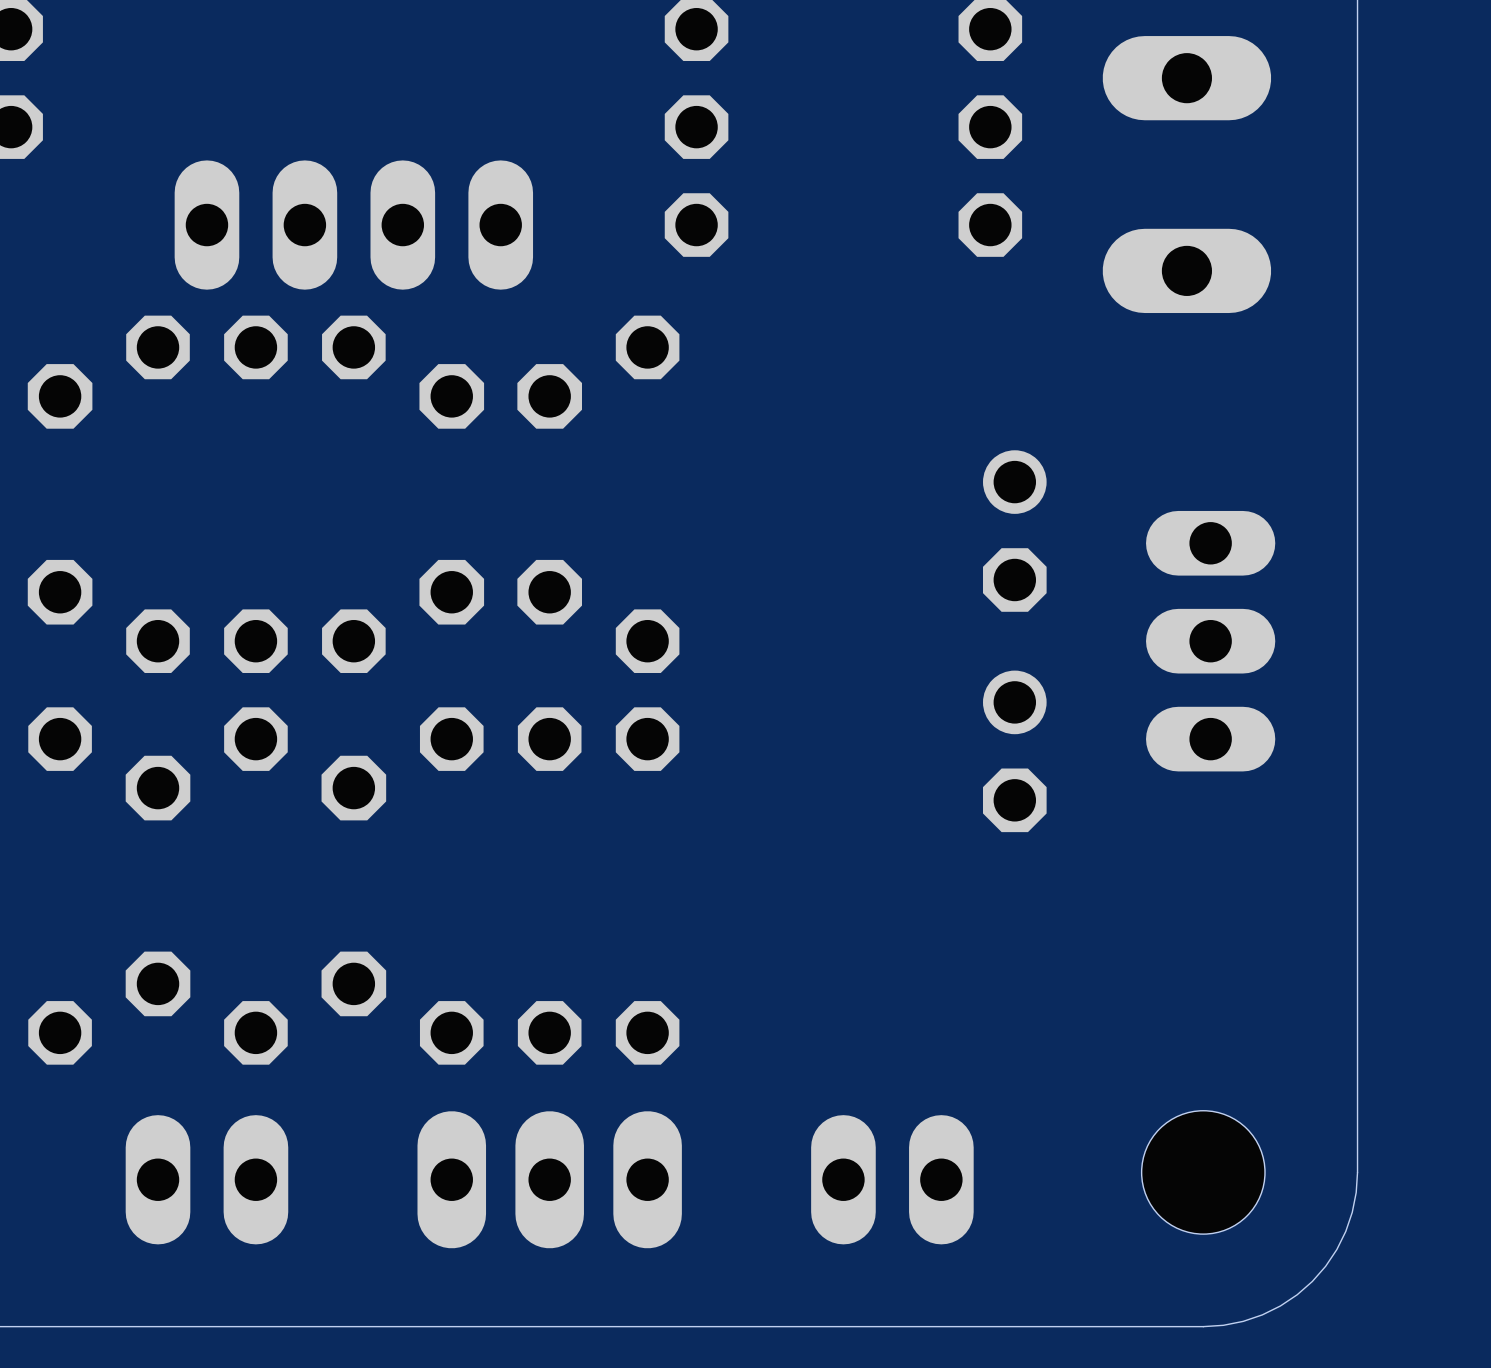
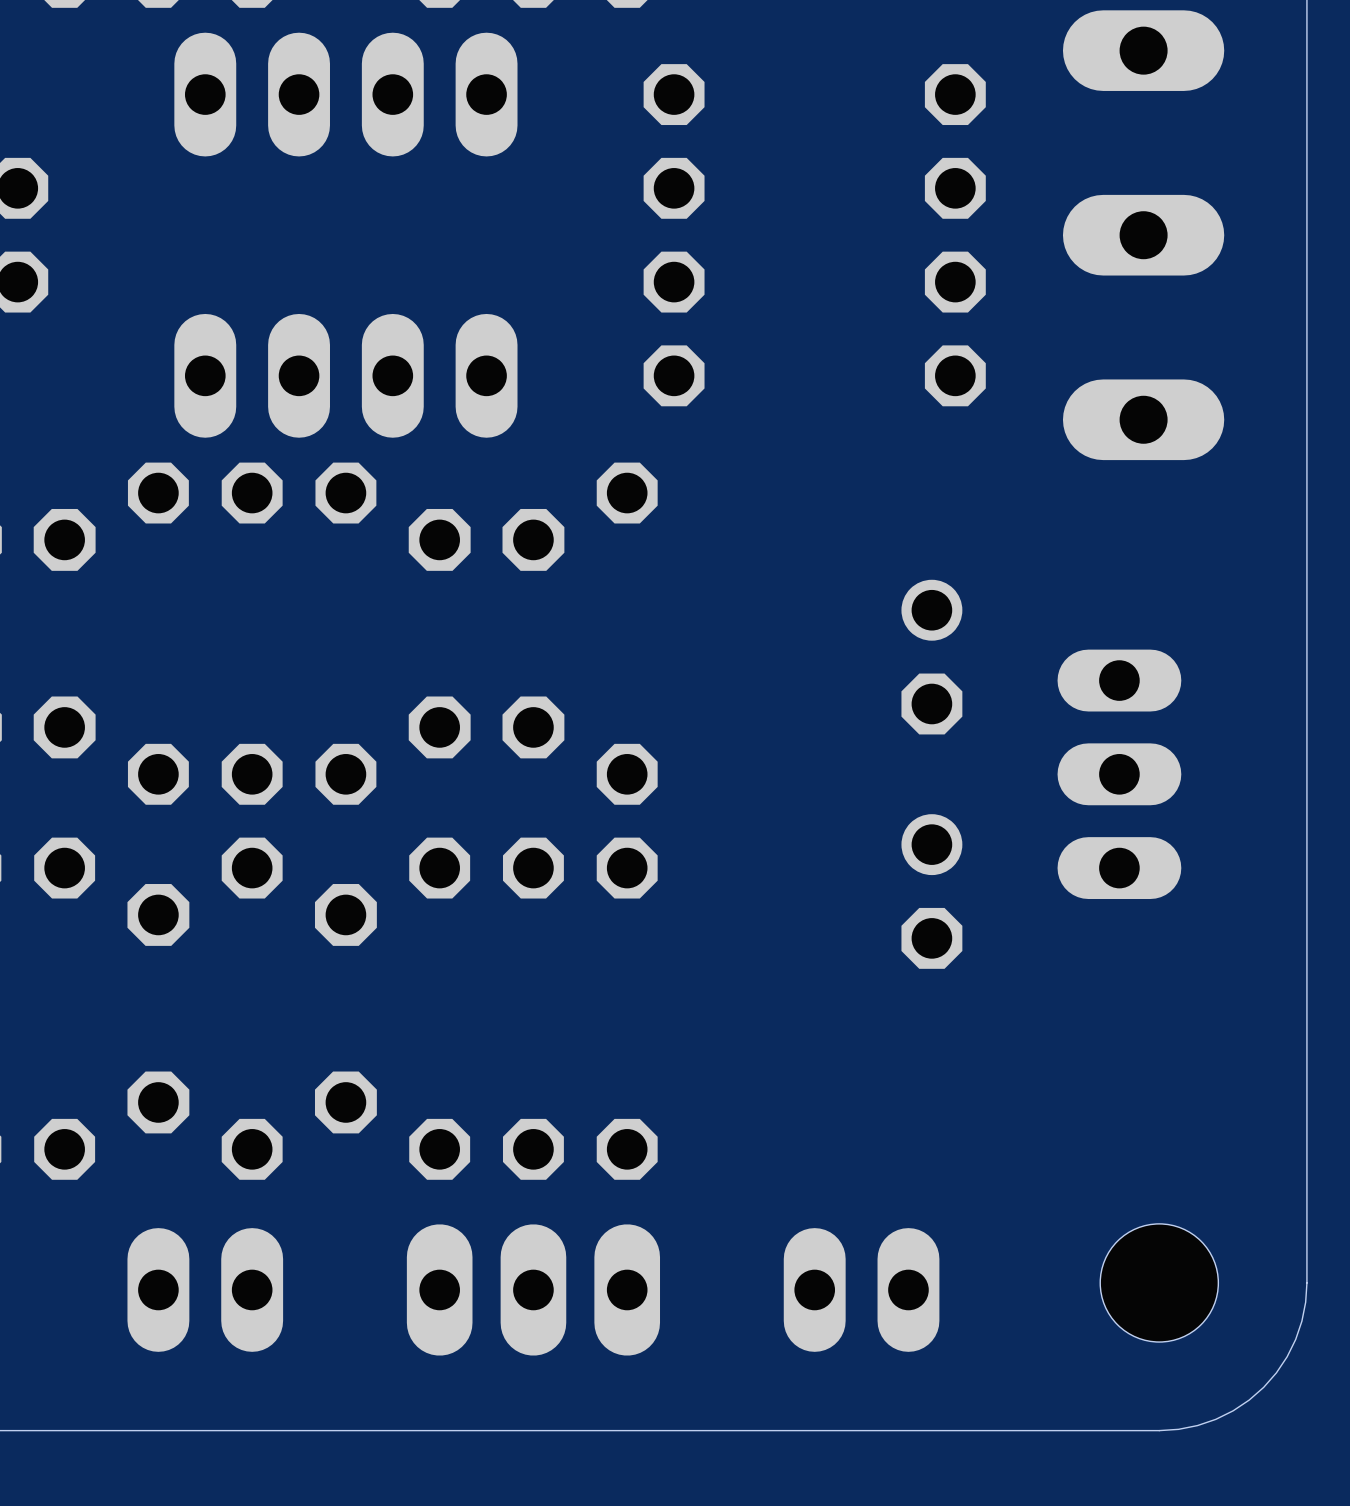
part position: (1014, 531) -> (931, 657)
part position: (1210, 641) -> (1119, 774)
part position: (1014, 751) -> (931, 891)

